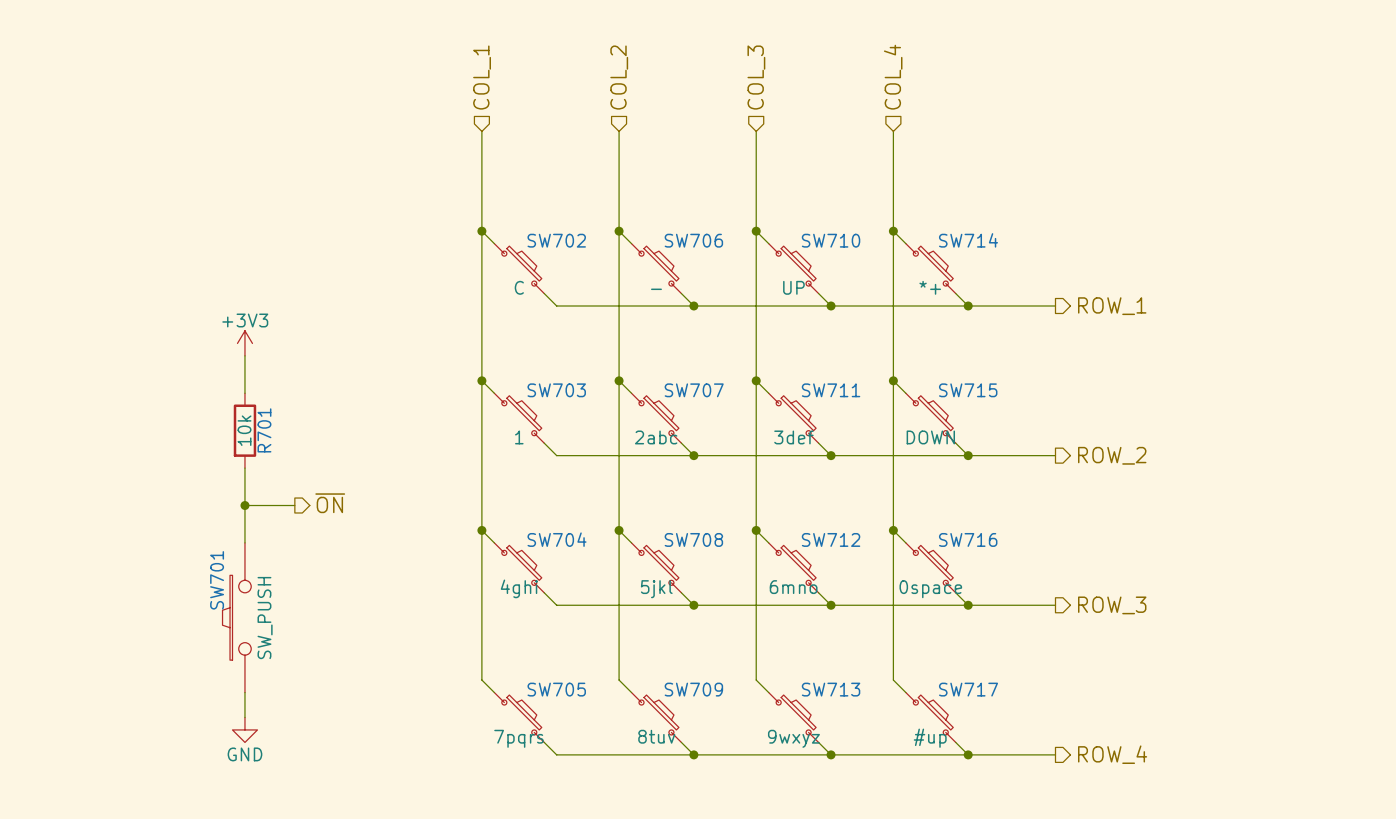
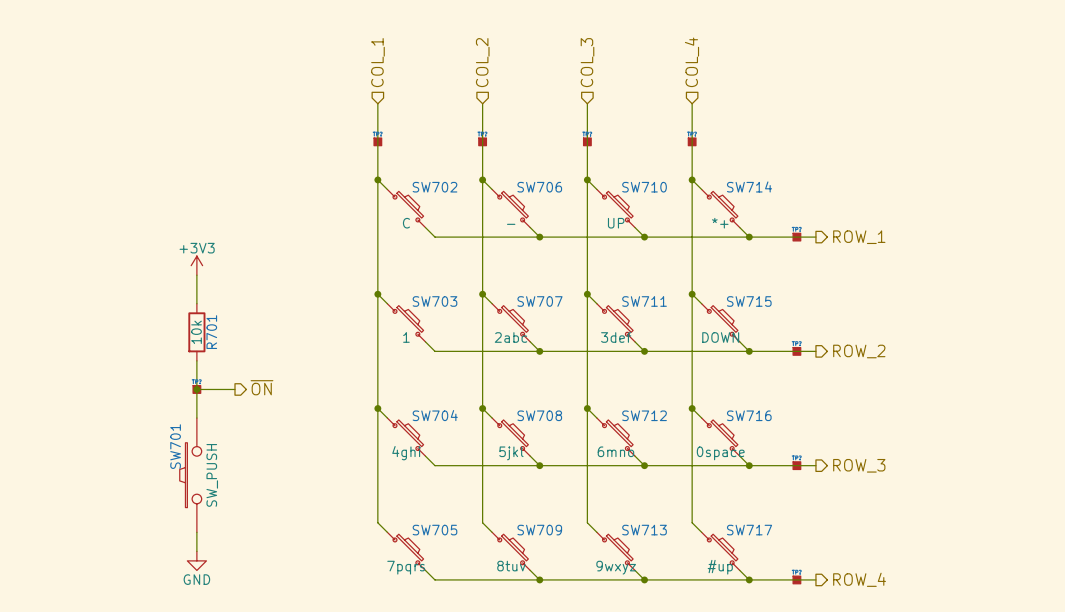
part: none -> (377, 141)
part: none -> (482, 141)
part: none -> (587, 141)
part: none -> (692, 141)
part: none -> (796, 237)
part: none -> (796, 351)
part: none -> (196, 389)
part: none -> (796, 465)
part: none -> (796, 579)

